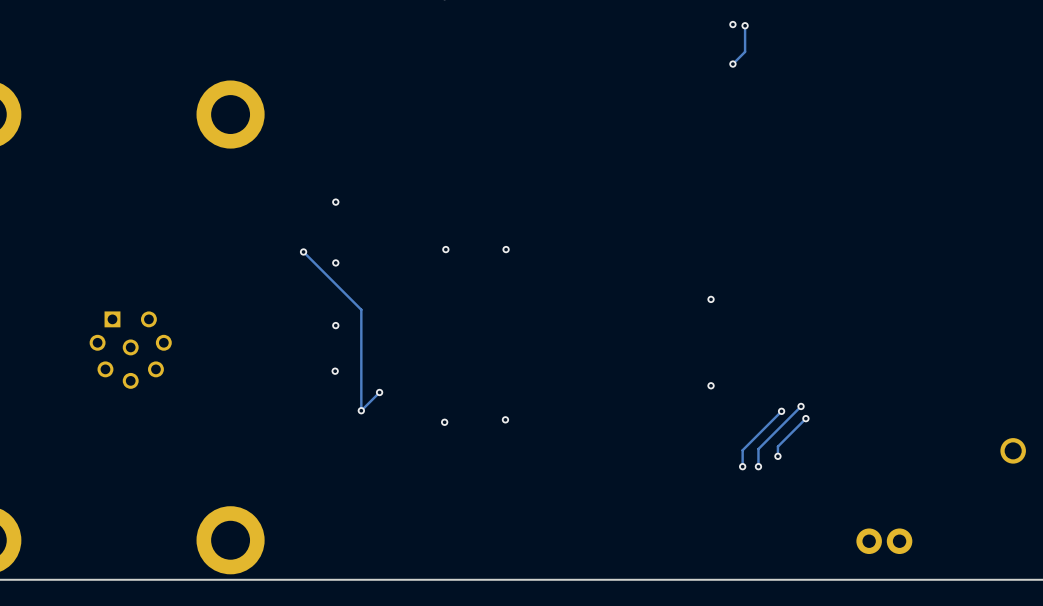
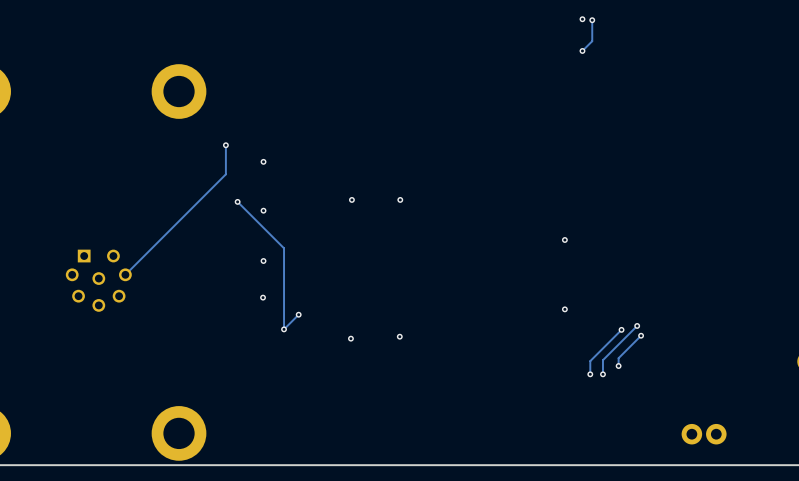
track: none -> (225, 145) (225, 174) (125, 274)
via: none -> (225, 145)

